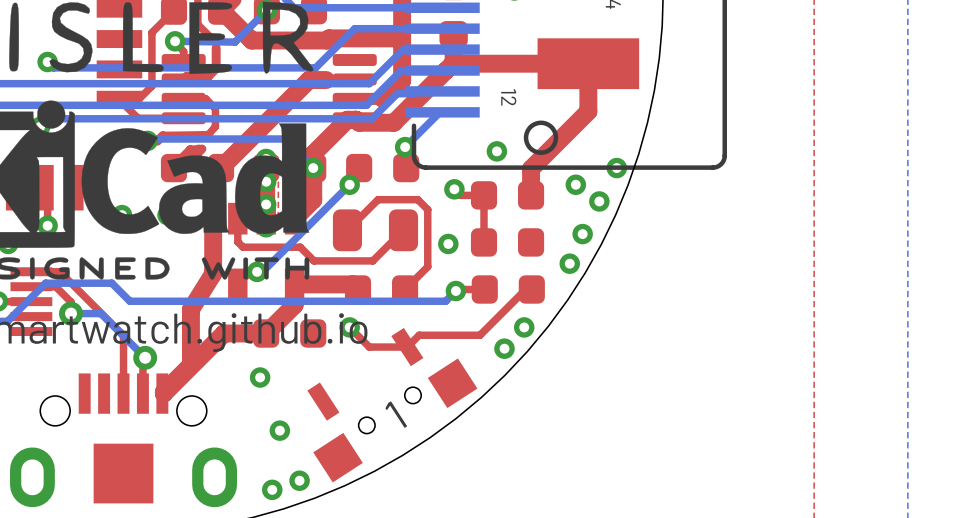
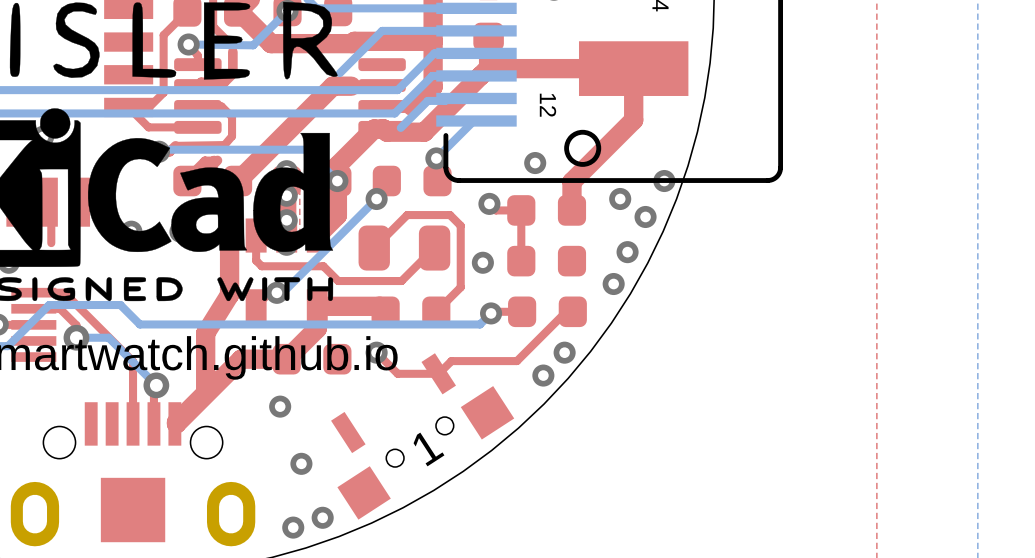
bottom track: (47, 62) (53, 67) (315, 67) -> none
via: (47, 62) -> none
bottom track: (372, 118) (48, 118) (40, 126) -> none
via: (47, 225) -> none

